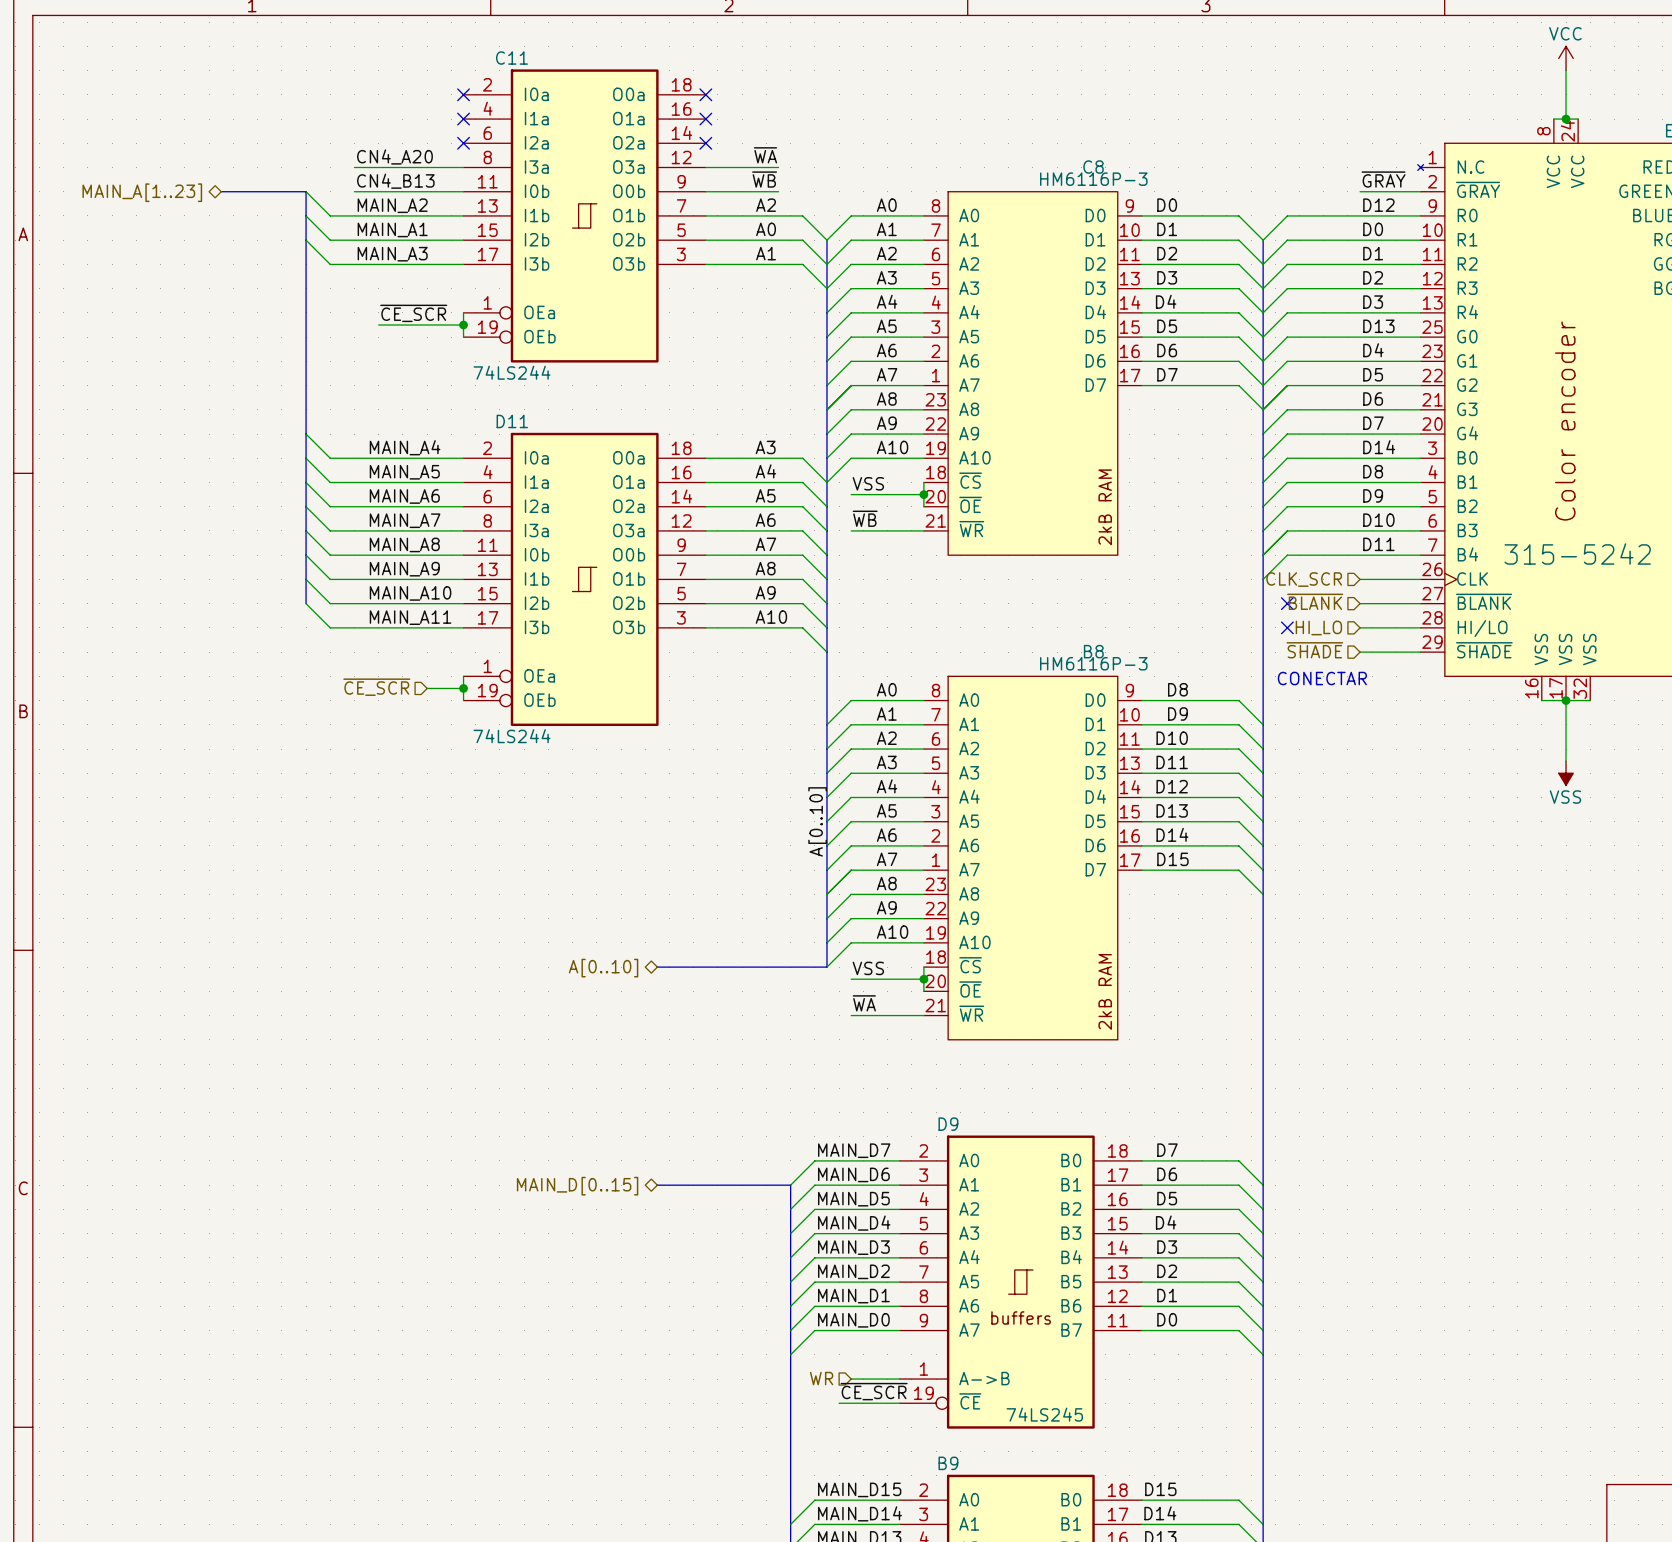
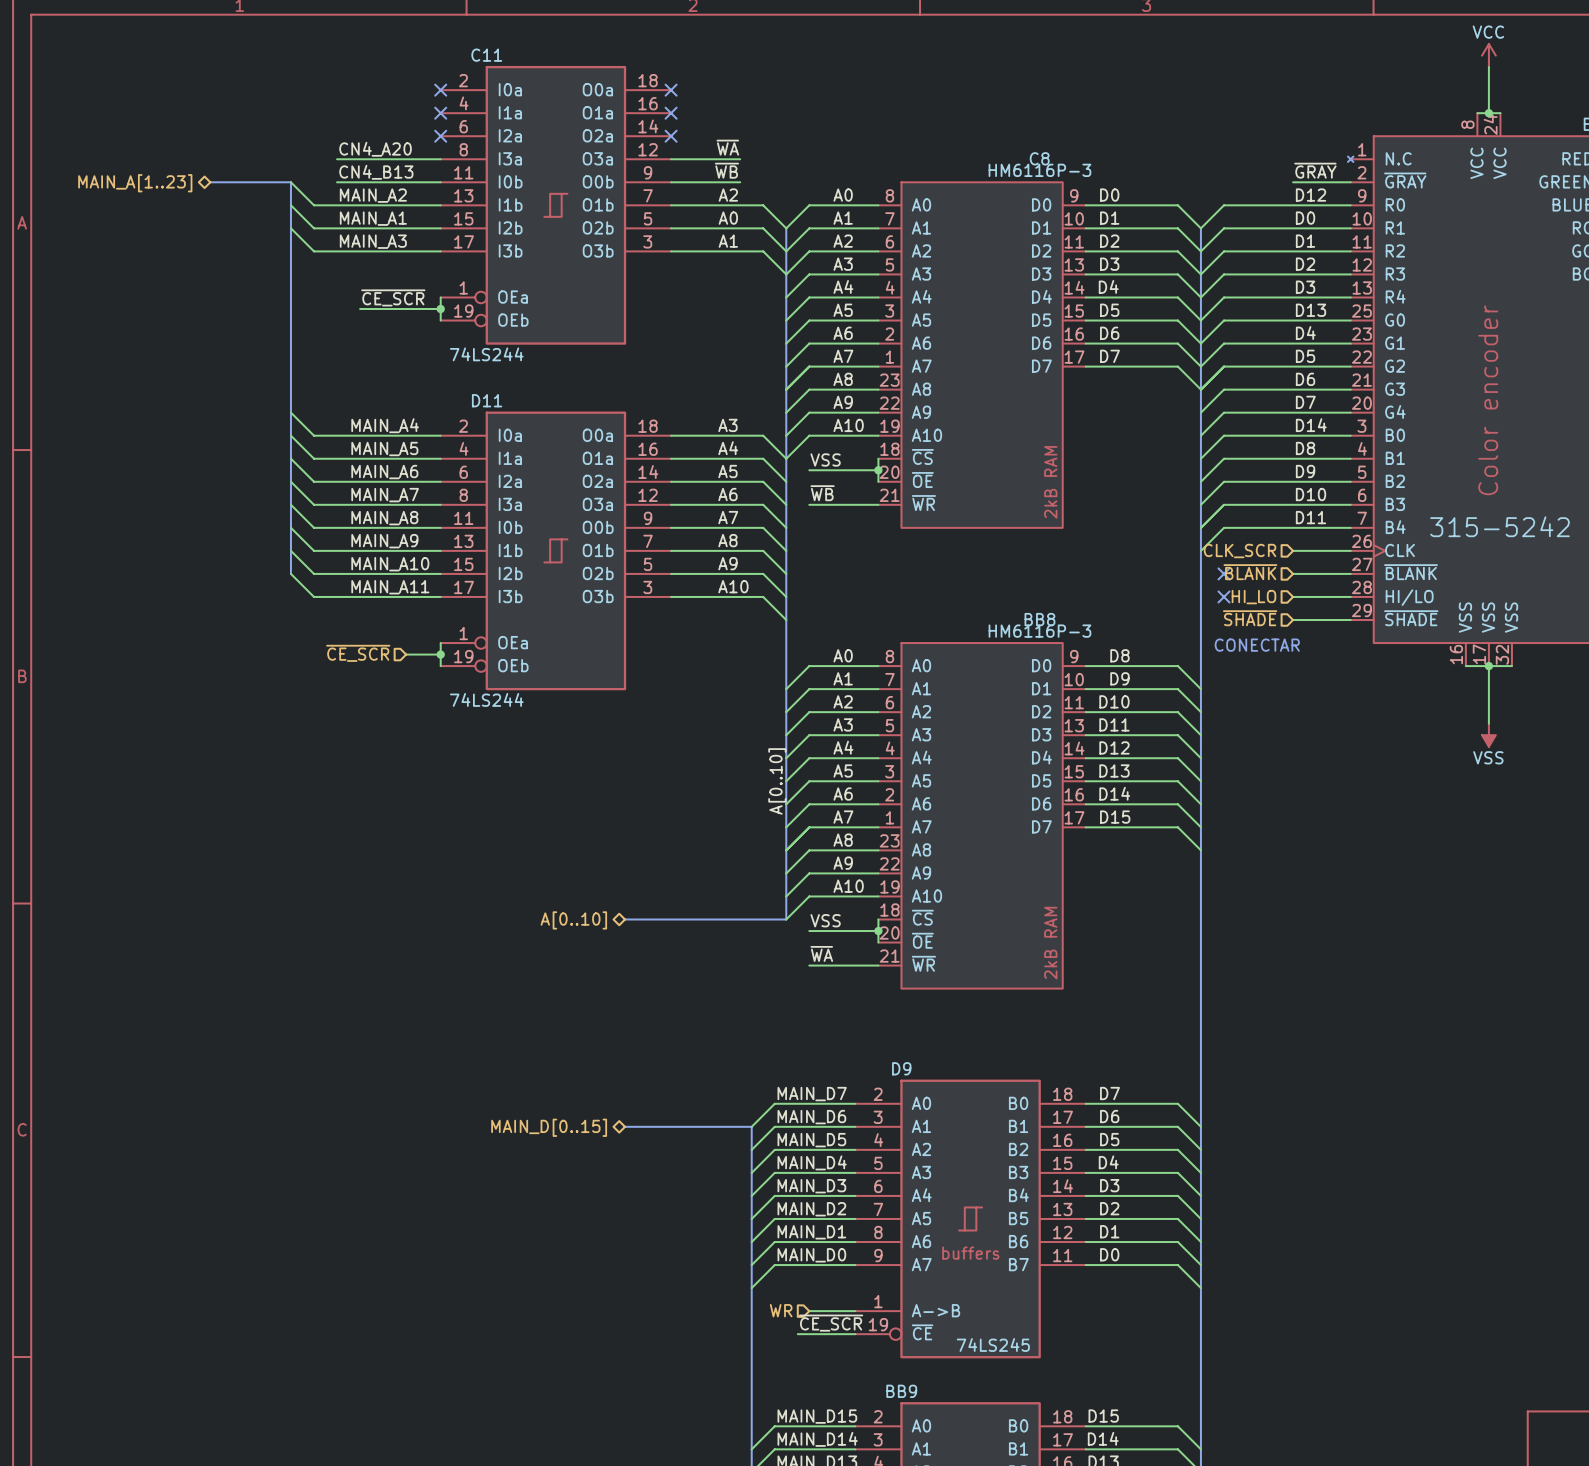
B8 name: B8 (1093, 651) -> BB8 (1039, 619)
B9 name: B9 (948, 1463) -> BB9 (901, 1391)

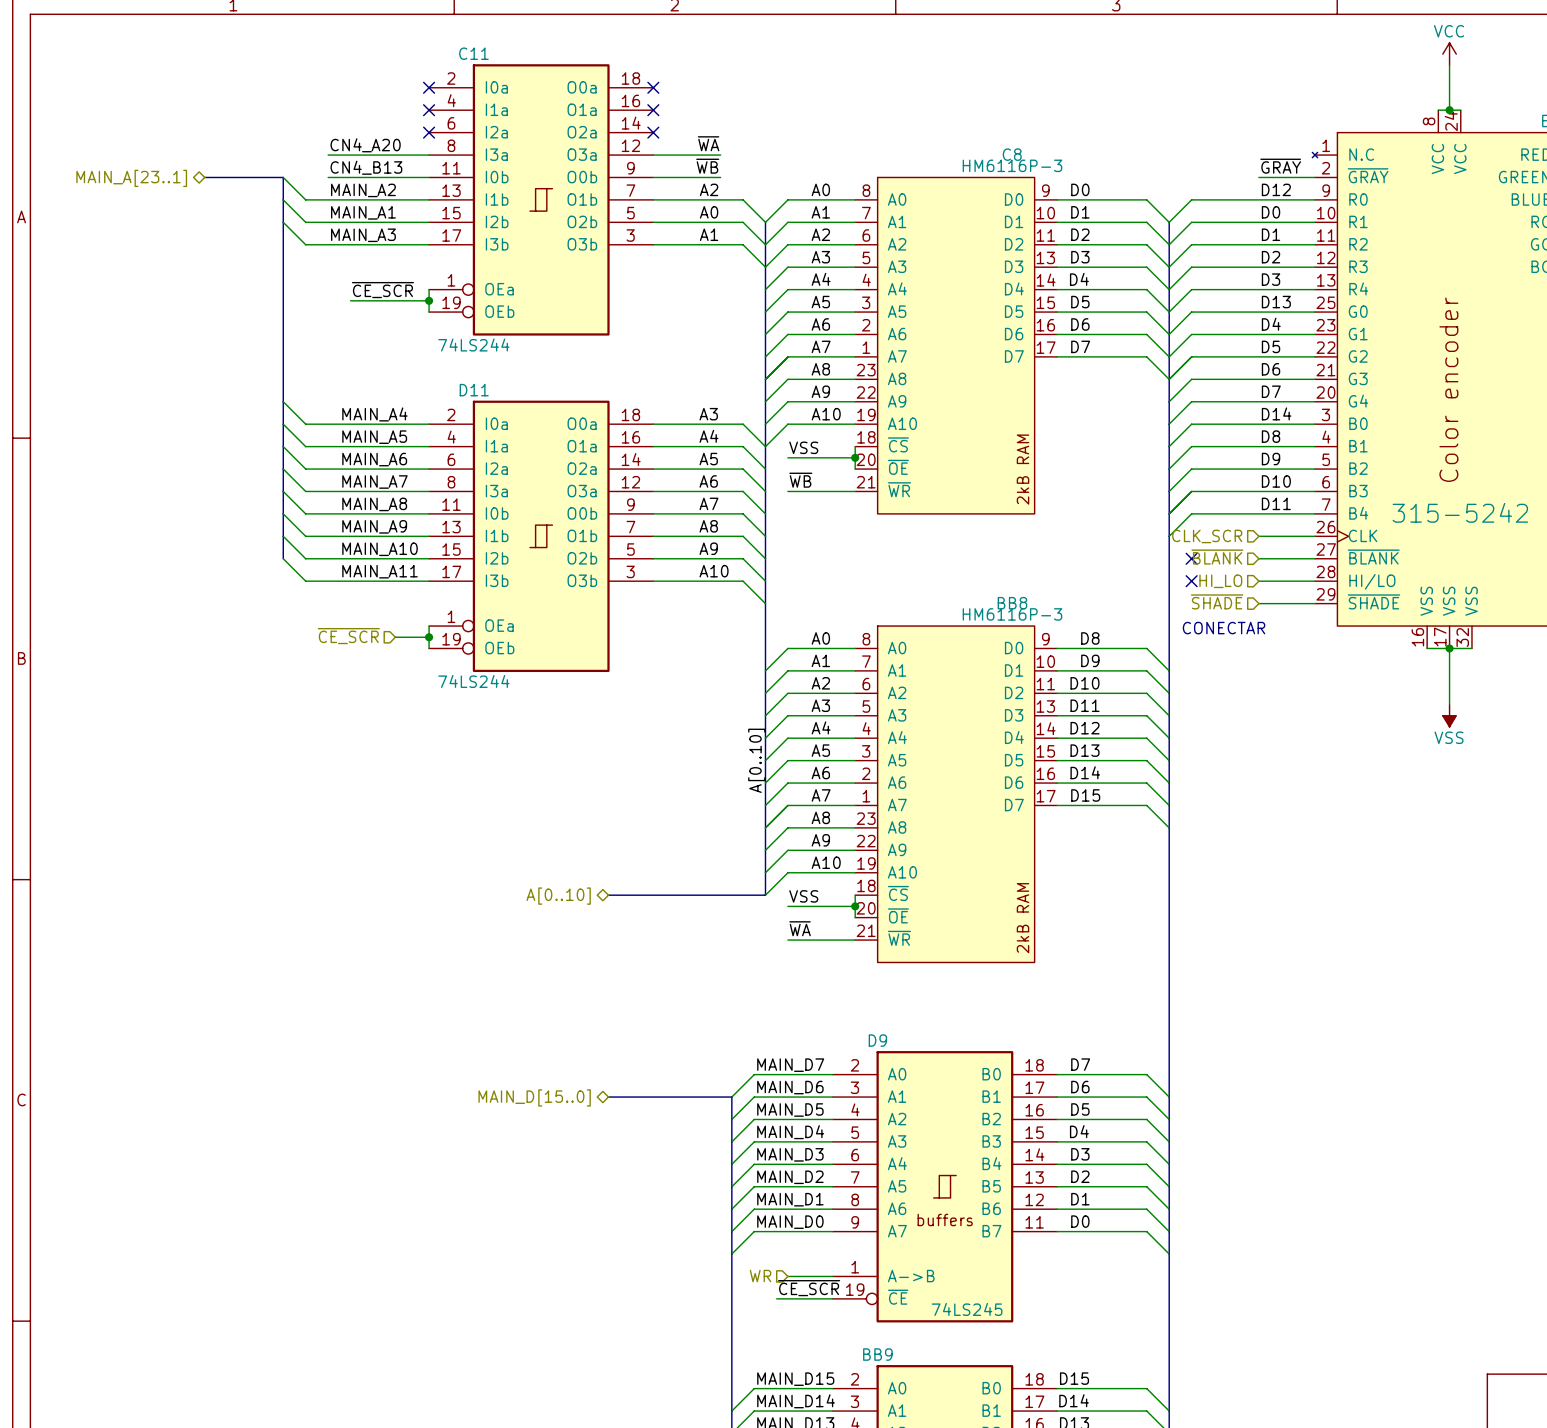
hierarchical label: MAIN_A[1..23] (135, 183) -> MAIN_A[23..1] (131, 178)
hierarchical label: MAIN_D[0..15] (549, 1127) -> MAIN_D[15..0] (534, 1097)

